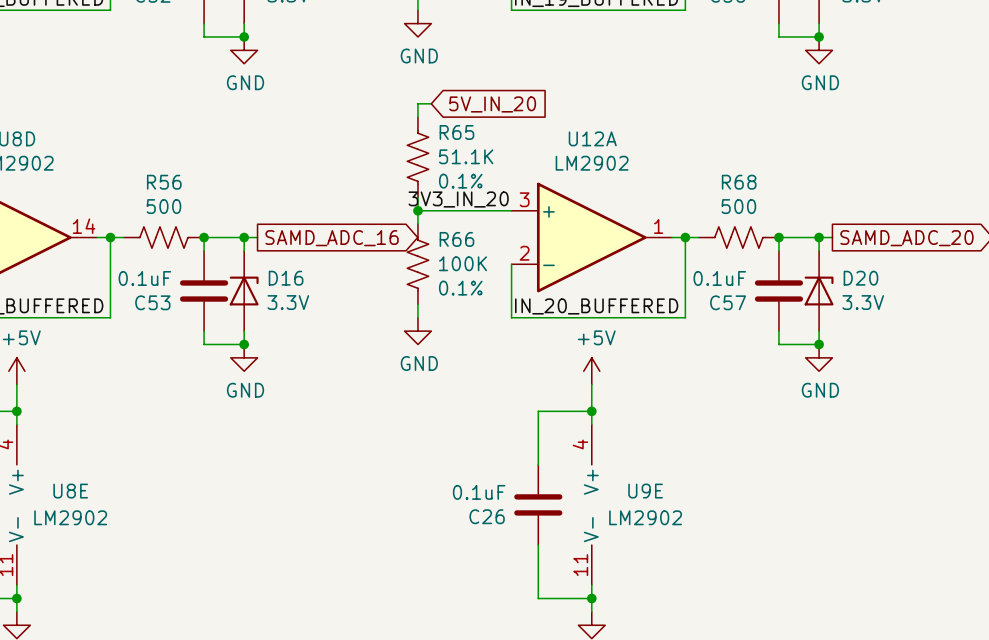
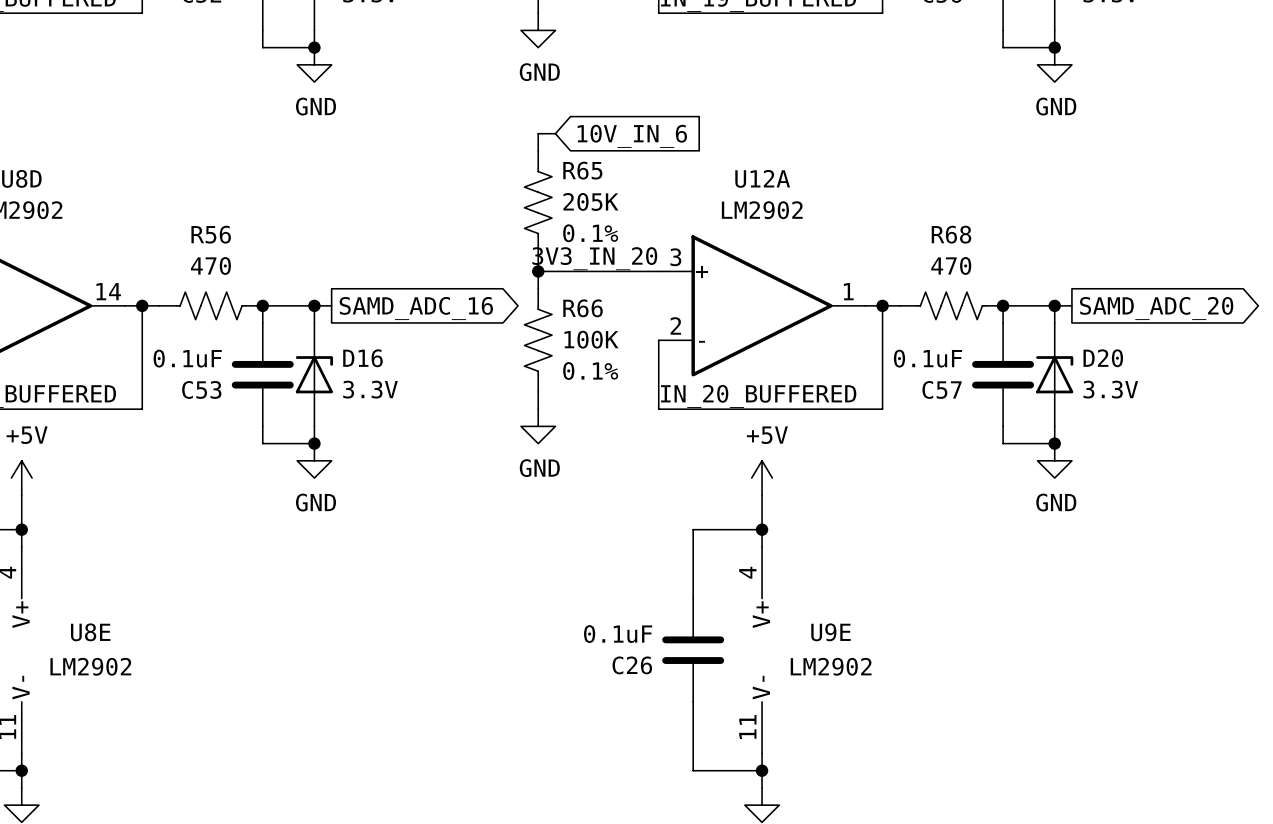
global label: 5V_IN_20 (492, 104) -> 10V_IN_6 (632, 136)
R65 value: 51.1K (466, 156) -> 205K (590, 201)
R56 value: 500 (163, 206) -> 470 (210, 265)
R68 value: 500 (738, 206) -> 470 (951, 265)

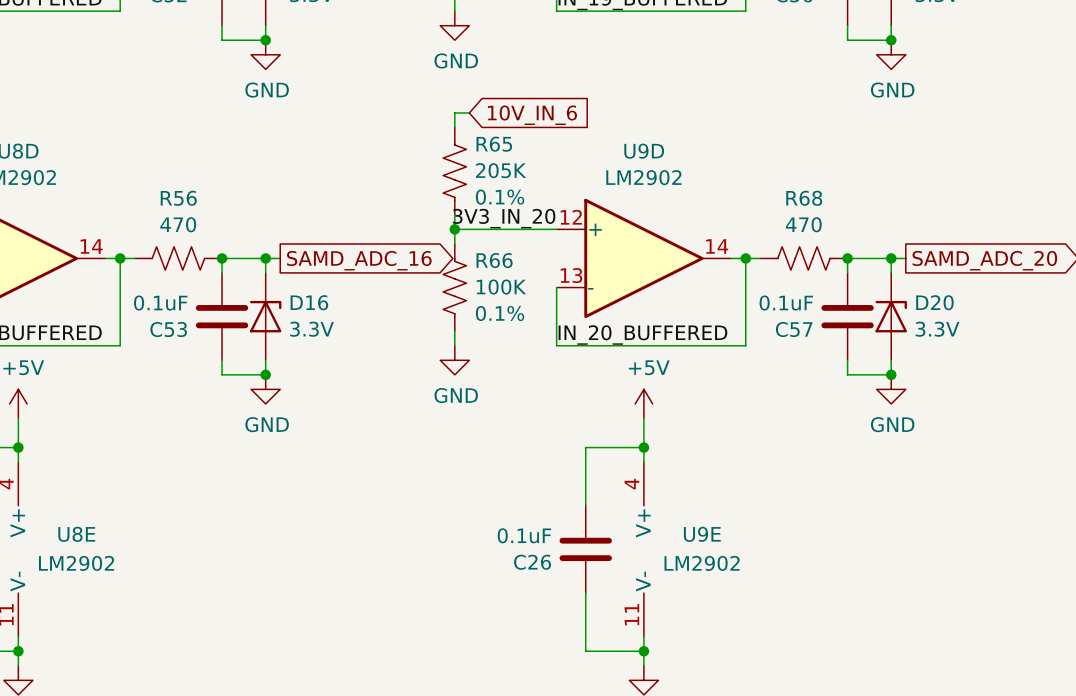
U12A name: U12A (762, 178) -> U9D (644, 151)
U12A pin number: 3 (675, 257) -> 12 (571, 217)
U12A pin number: 1 (848, 291) -> 14 (717, 246)
U12A pin number: 2 (675, 325) -> 13 (571, 275)

